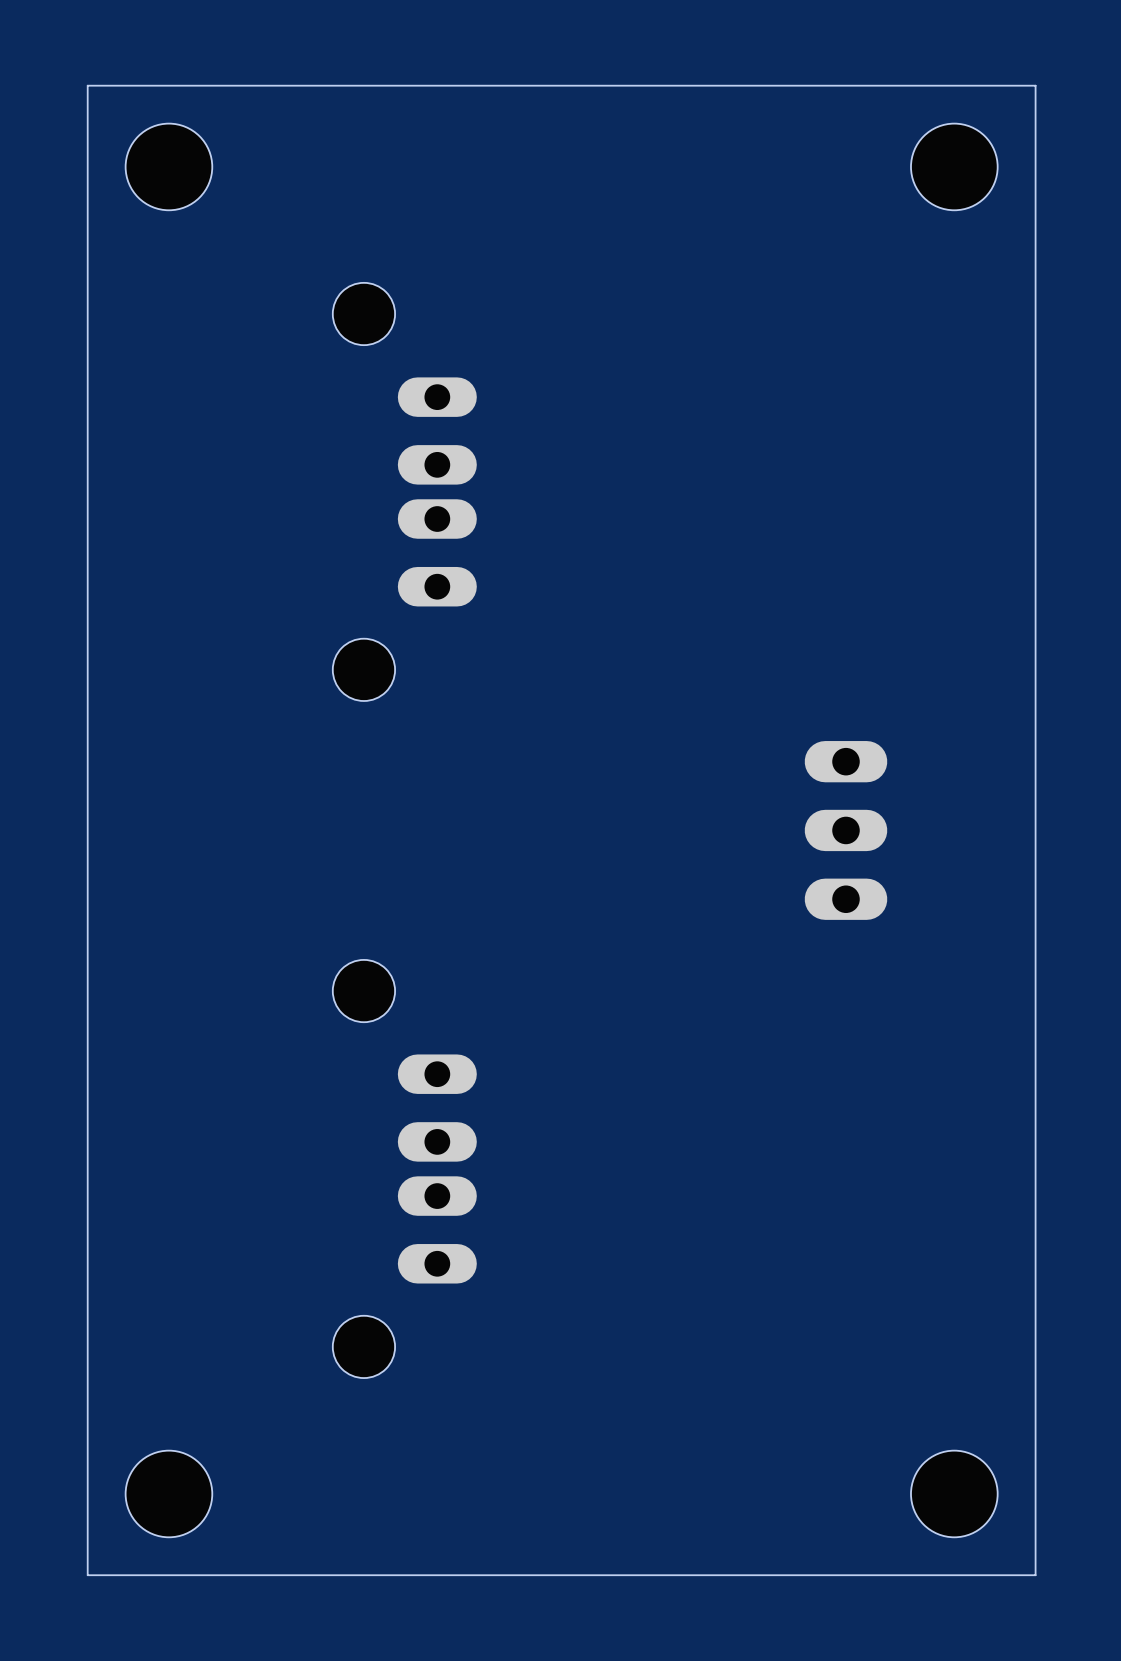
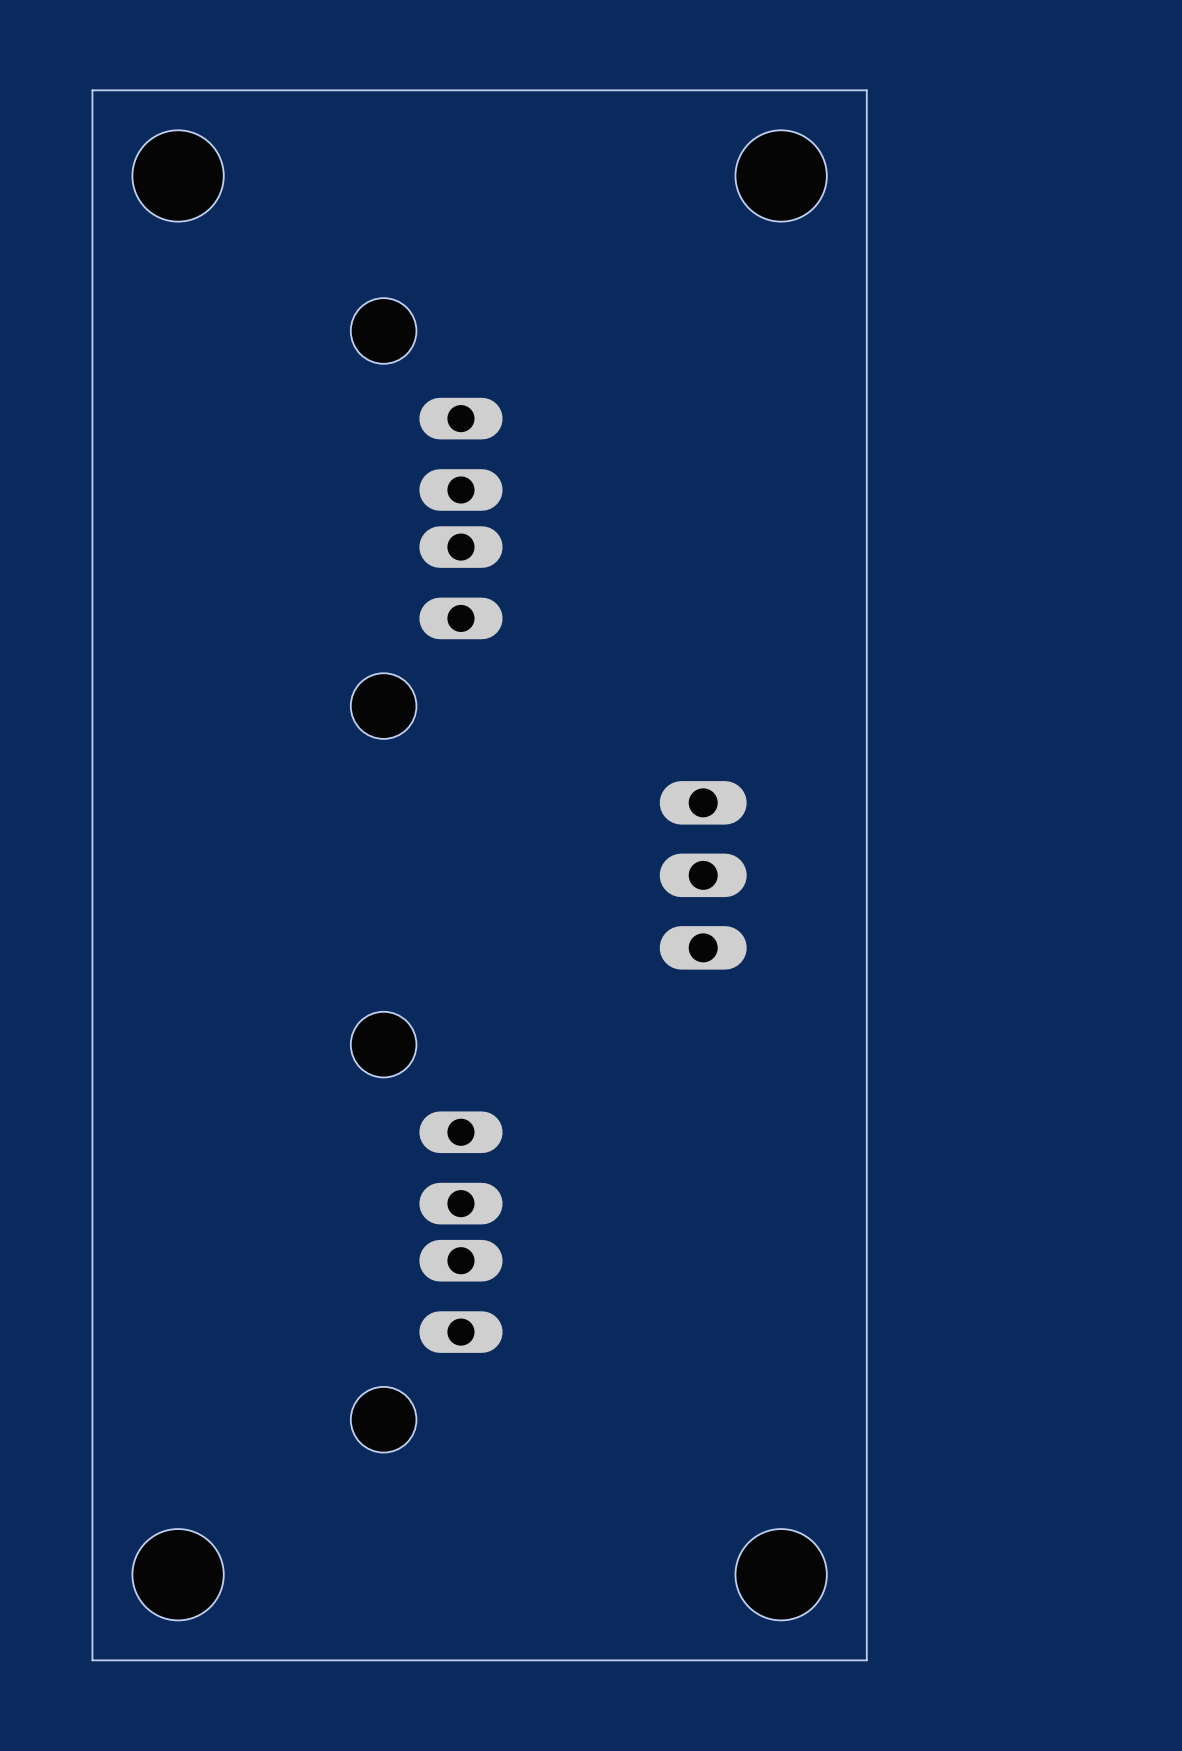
board edge: (822, 85) (1035, 85) (1035, 1575) (822, 1575) -> (866, 90) (866, 1660)
hole position: (954, 166) -> (781, 175)
part position: (846, 830) -> (703, 875)
hole position: (954, 1493) -> (781, 1574)

